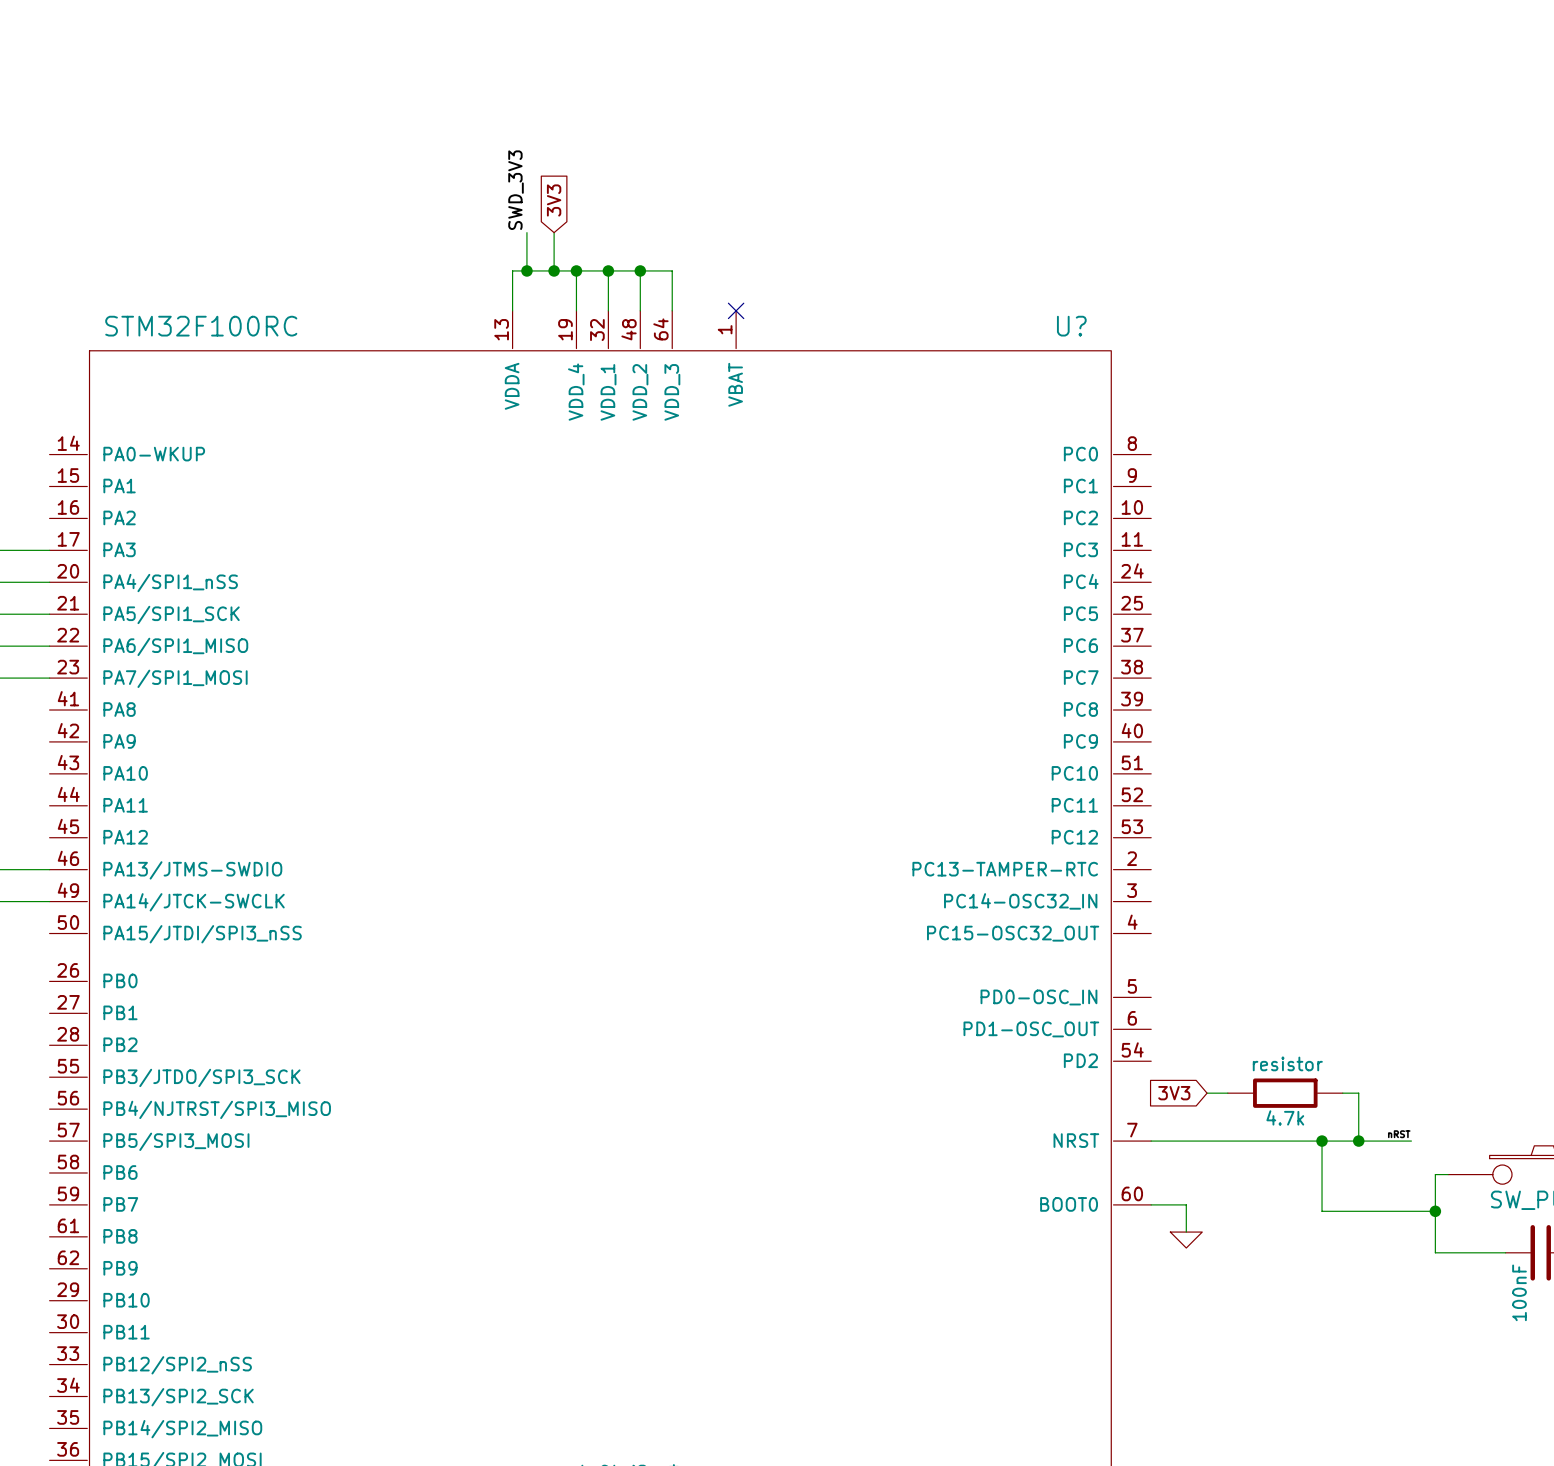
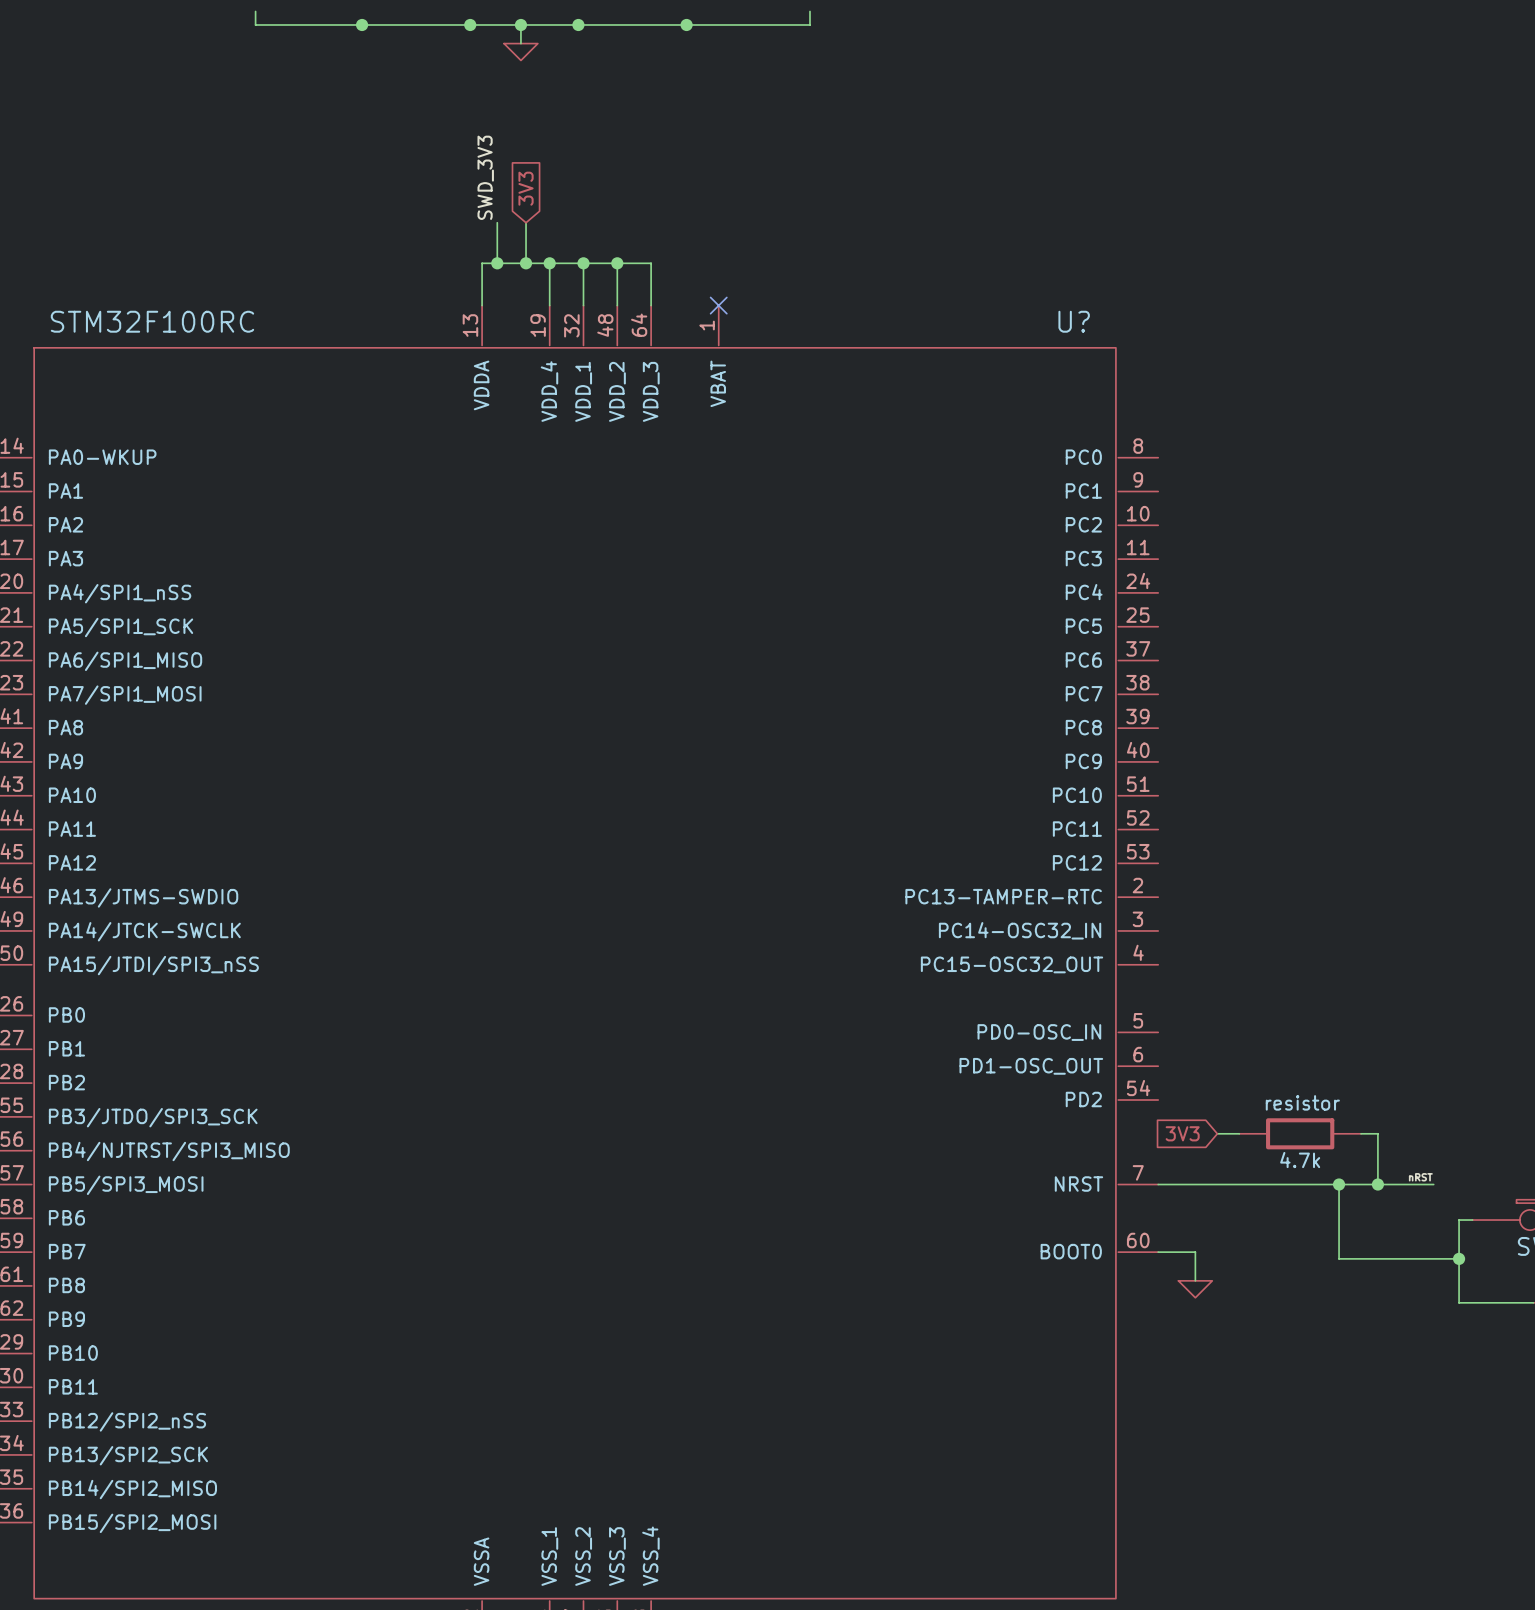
wire: none -> (255, 11) (255, 24) (809, 24) (809, 11)
junction: none -> (362, 24)
junction: none -> (470, 24)
wire: none -> (520, 24) (520, 43)
junction: none -> (520, 24)
junction: none -> (578, 24)
junction: none -> (686, 24)
power symbol: none -> (520, 52)

